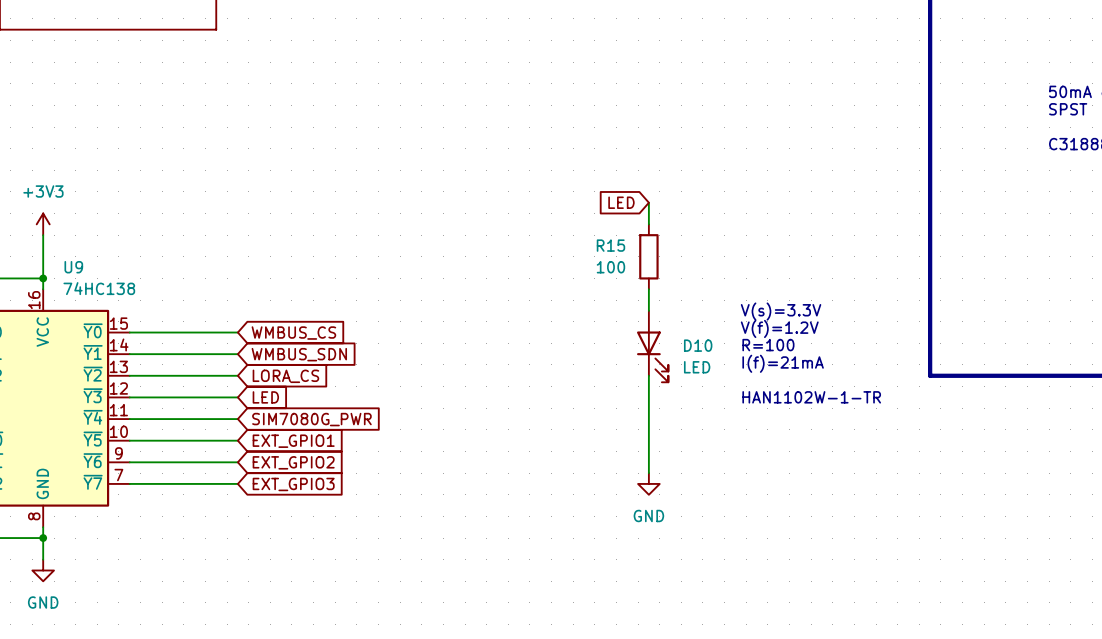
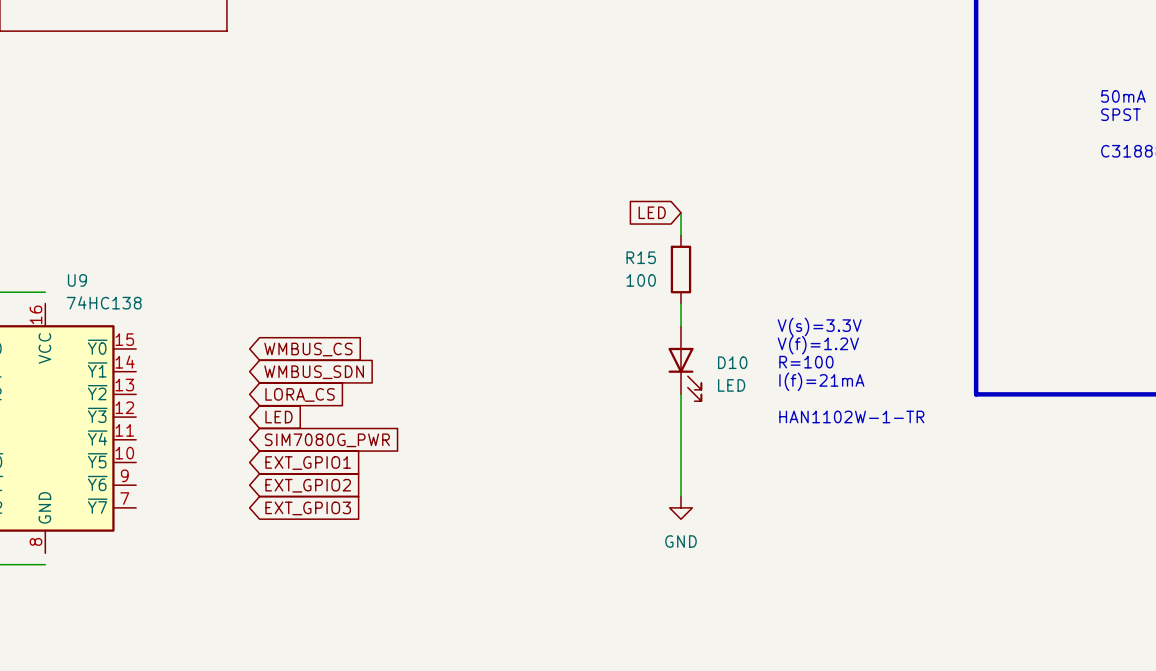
power symbol: +3V3 (43, 224) -> none
wire: (43, 235) (43, 289) -> none
junction: (43, 278) -> none
wire: (129, 332) (237, 332) -> none
wire: (129, 354) (237, 354) -> none
wire: (129, 375) (237, 375) -> none
wire: (129, 397) (237, 397) -> none
wire: (129, 419) (237, 419) -> none
wire: (129, 440) (237, 440) -> none
wire: (129, 462) (237, 462) -> none
wire: (129, 483) (237, 483) -> none
wire: (43, 527) (43, 559) -> none
junction: (43, 538) -> none
power symbol: GND (43, 570) -> none

